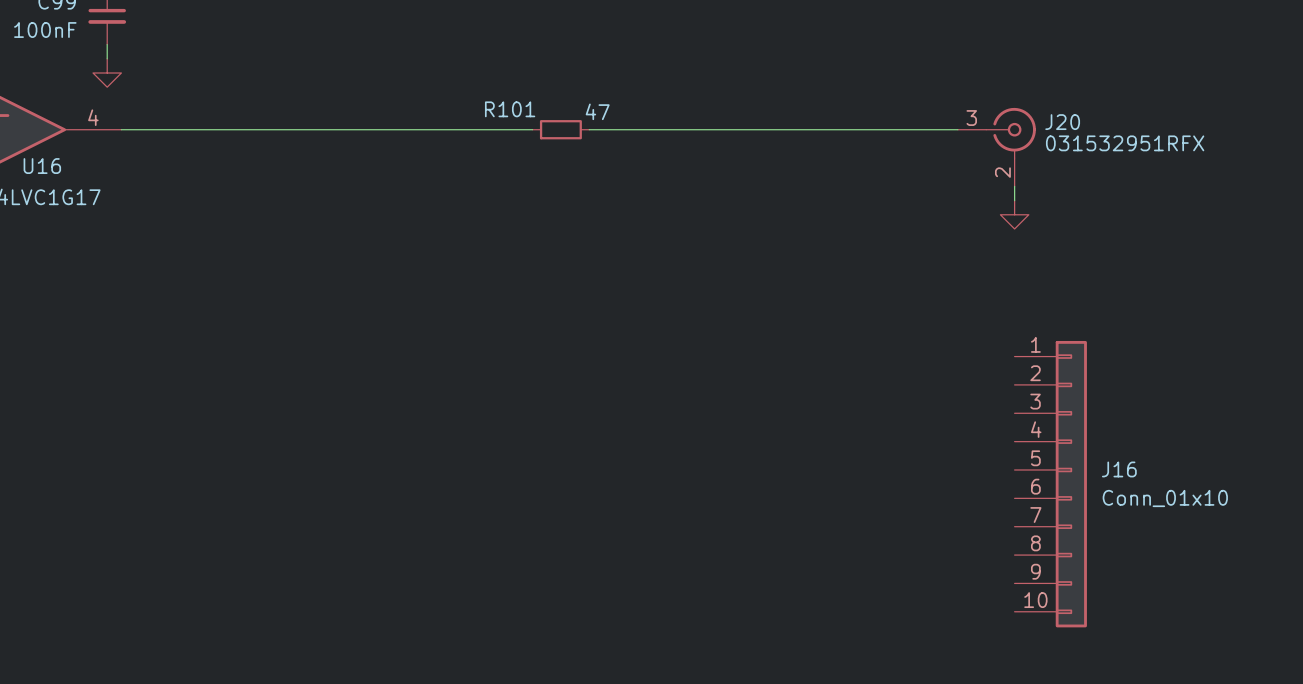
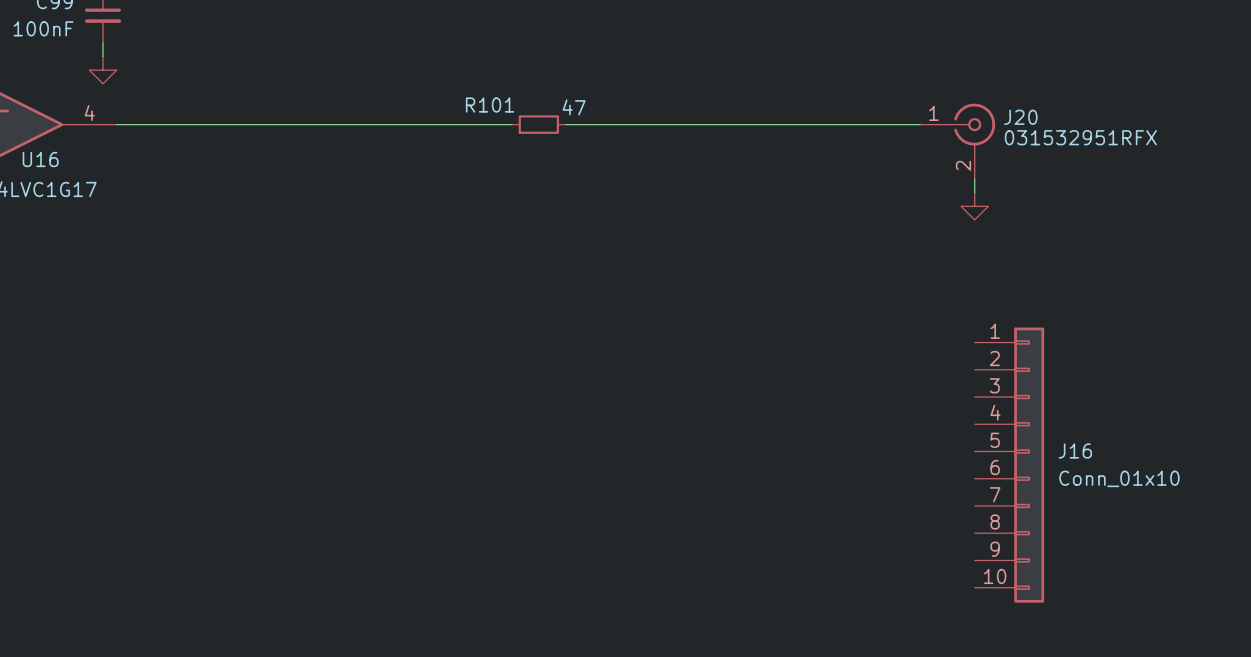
J20 pin number: 3 (971, 118) -> 1 (933, 113)

